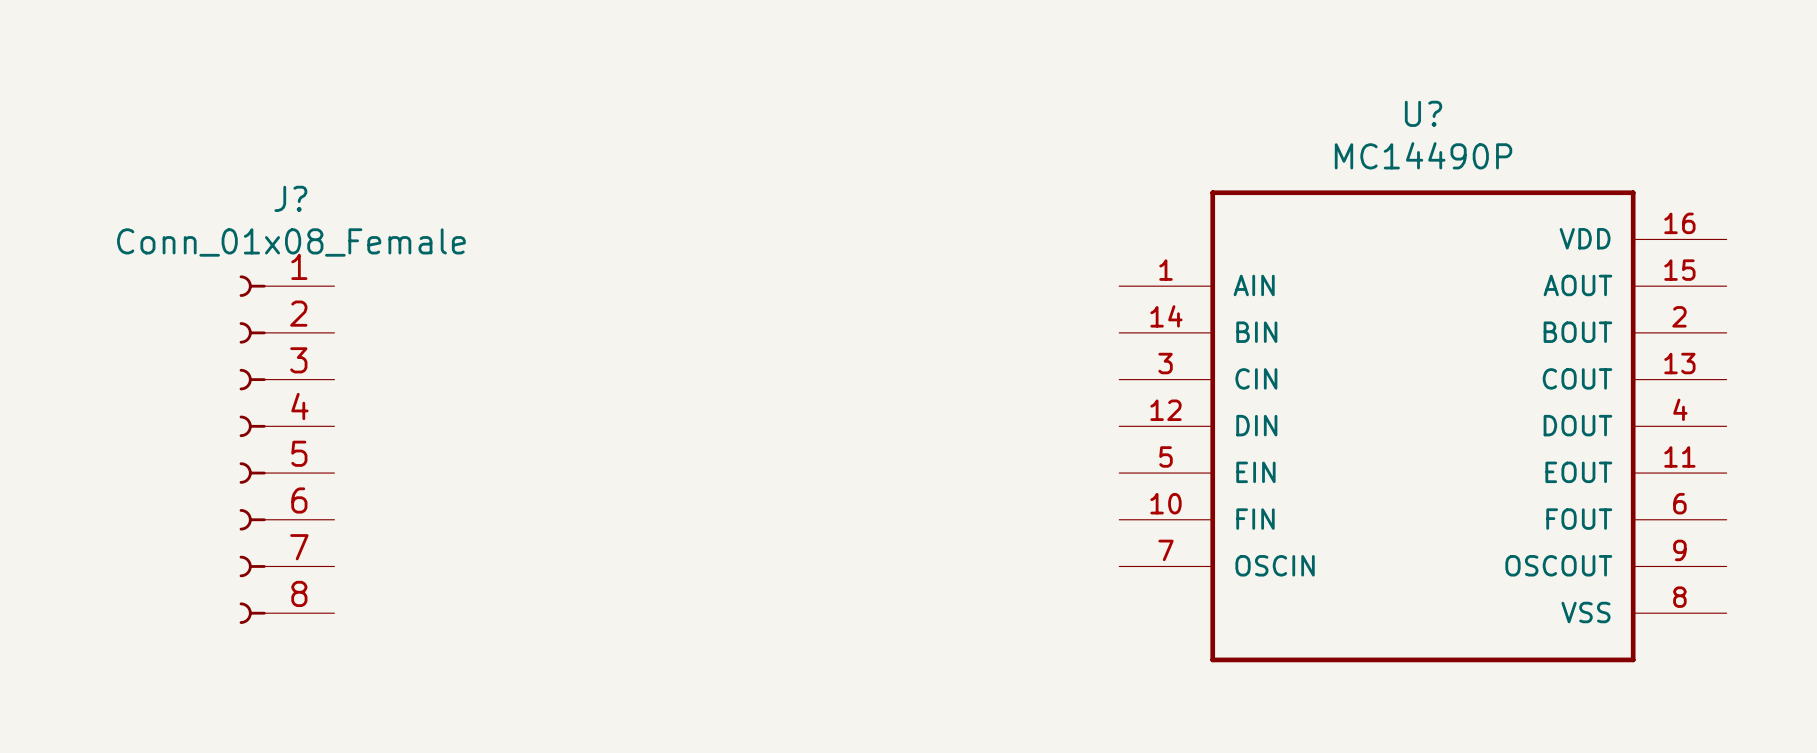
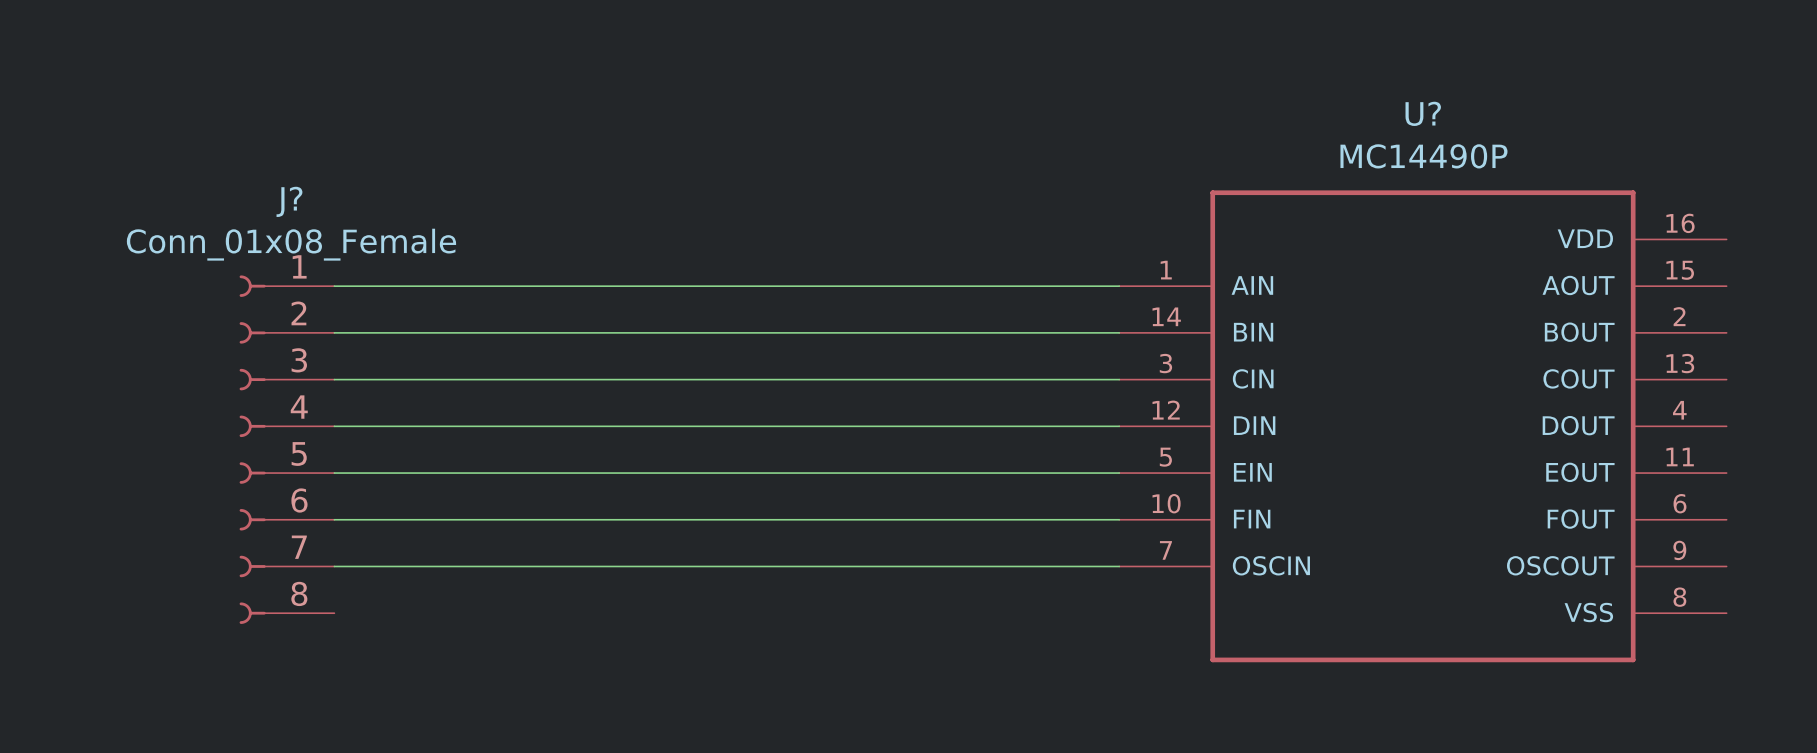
wire: none -> (334, 286) (1119, 286)
wire: none -> (334, 332) (1119, 332)
wire: none -> (334, 379) (1119, 379)
wire: none -> (334, 426) (1119, 426)
wire: none -> (334, 473) (1119, 473)
wire: none -> (334, 519) (1119, 519)
wire: none -> (334, 566) (1119, 566)

